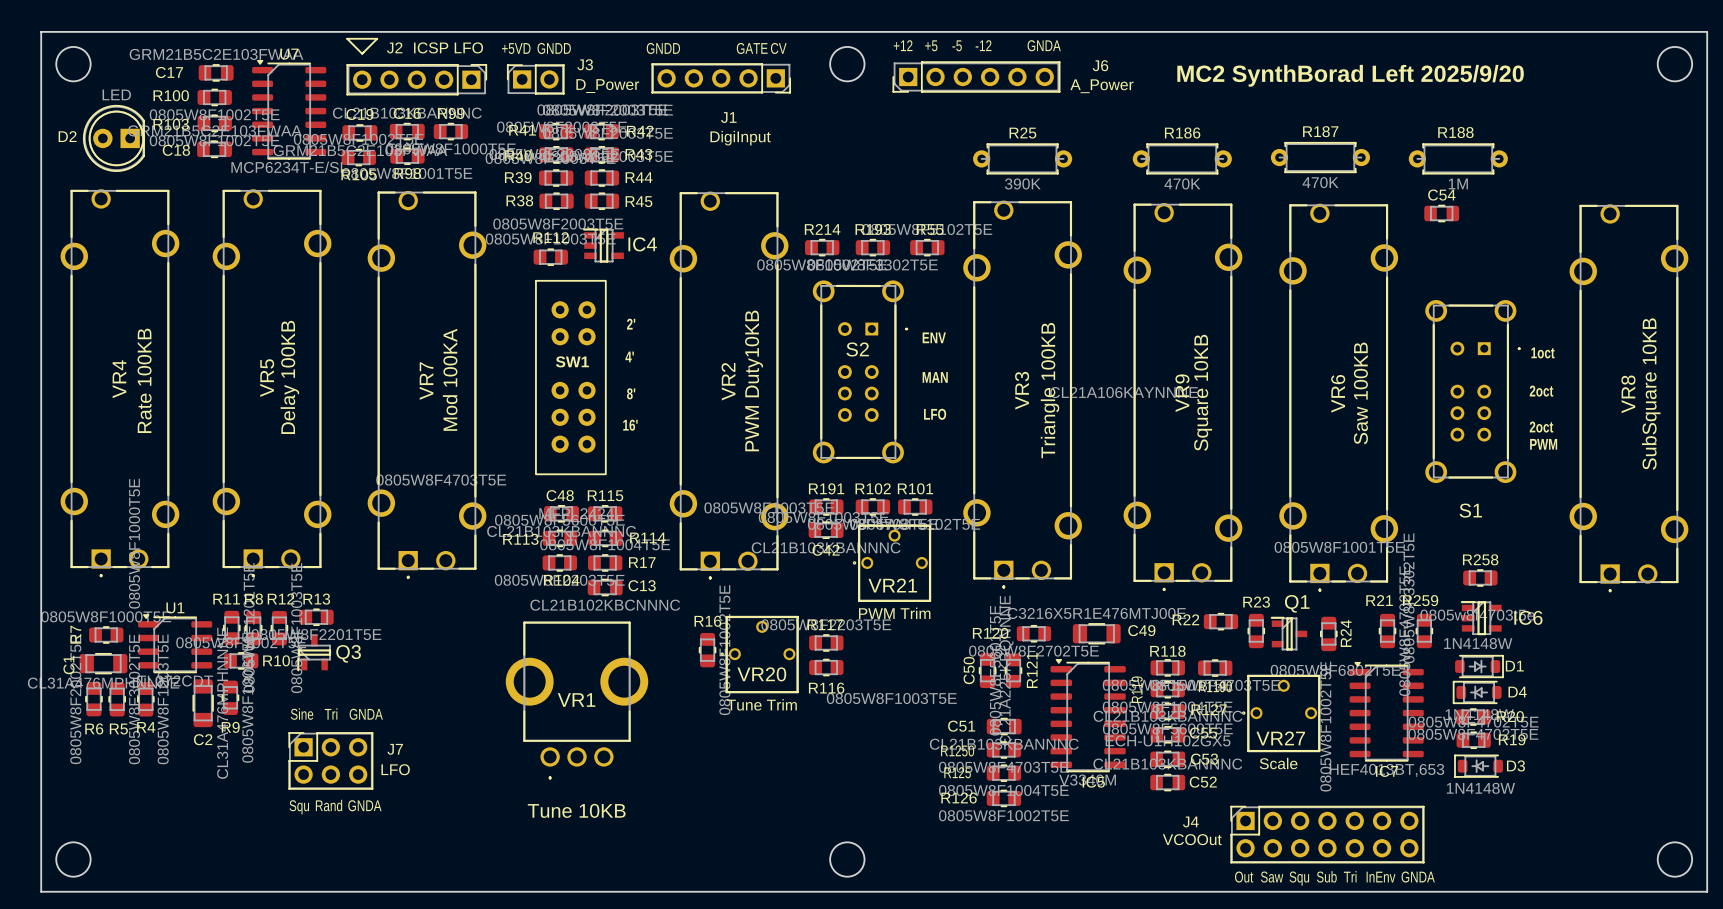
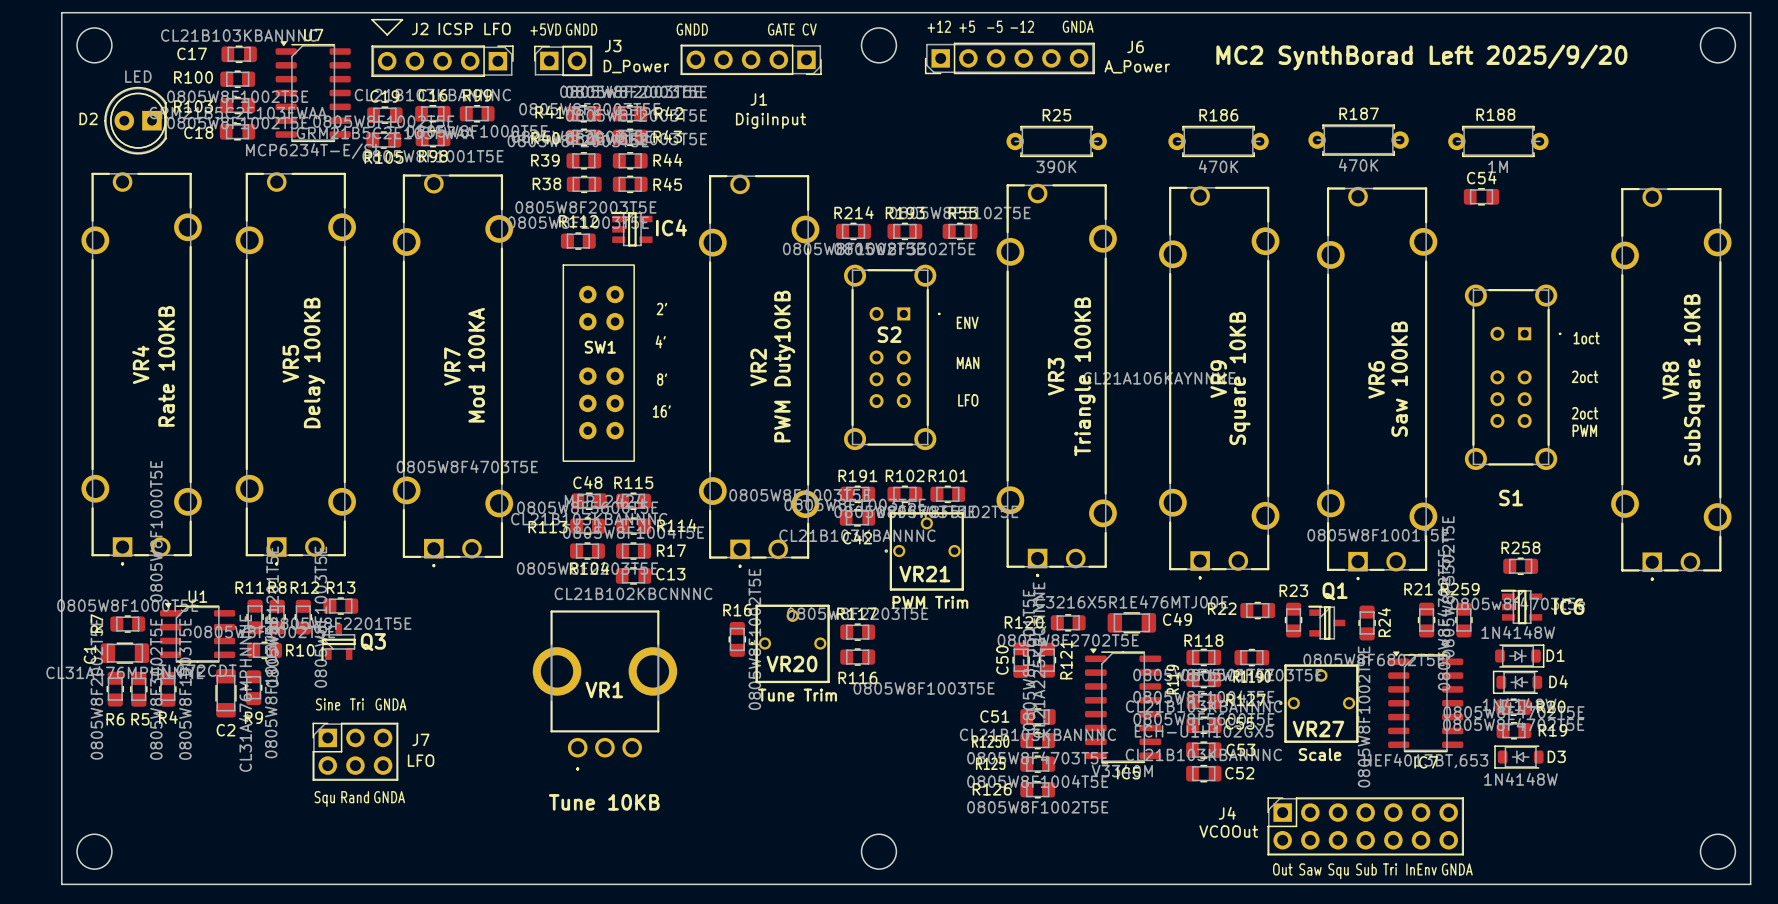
C17 value: GRM21B5C2E103FWAA (216, 54) -> CL21B103KBANNNC (239, 35)

